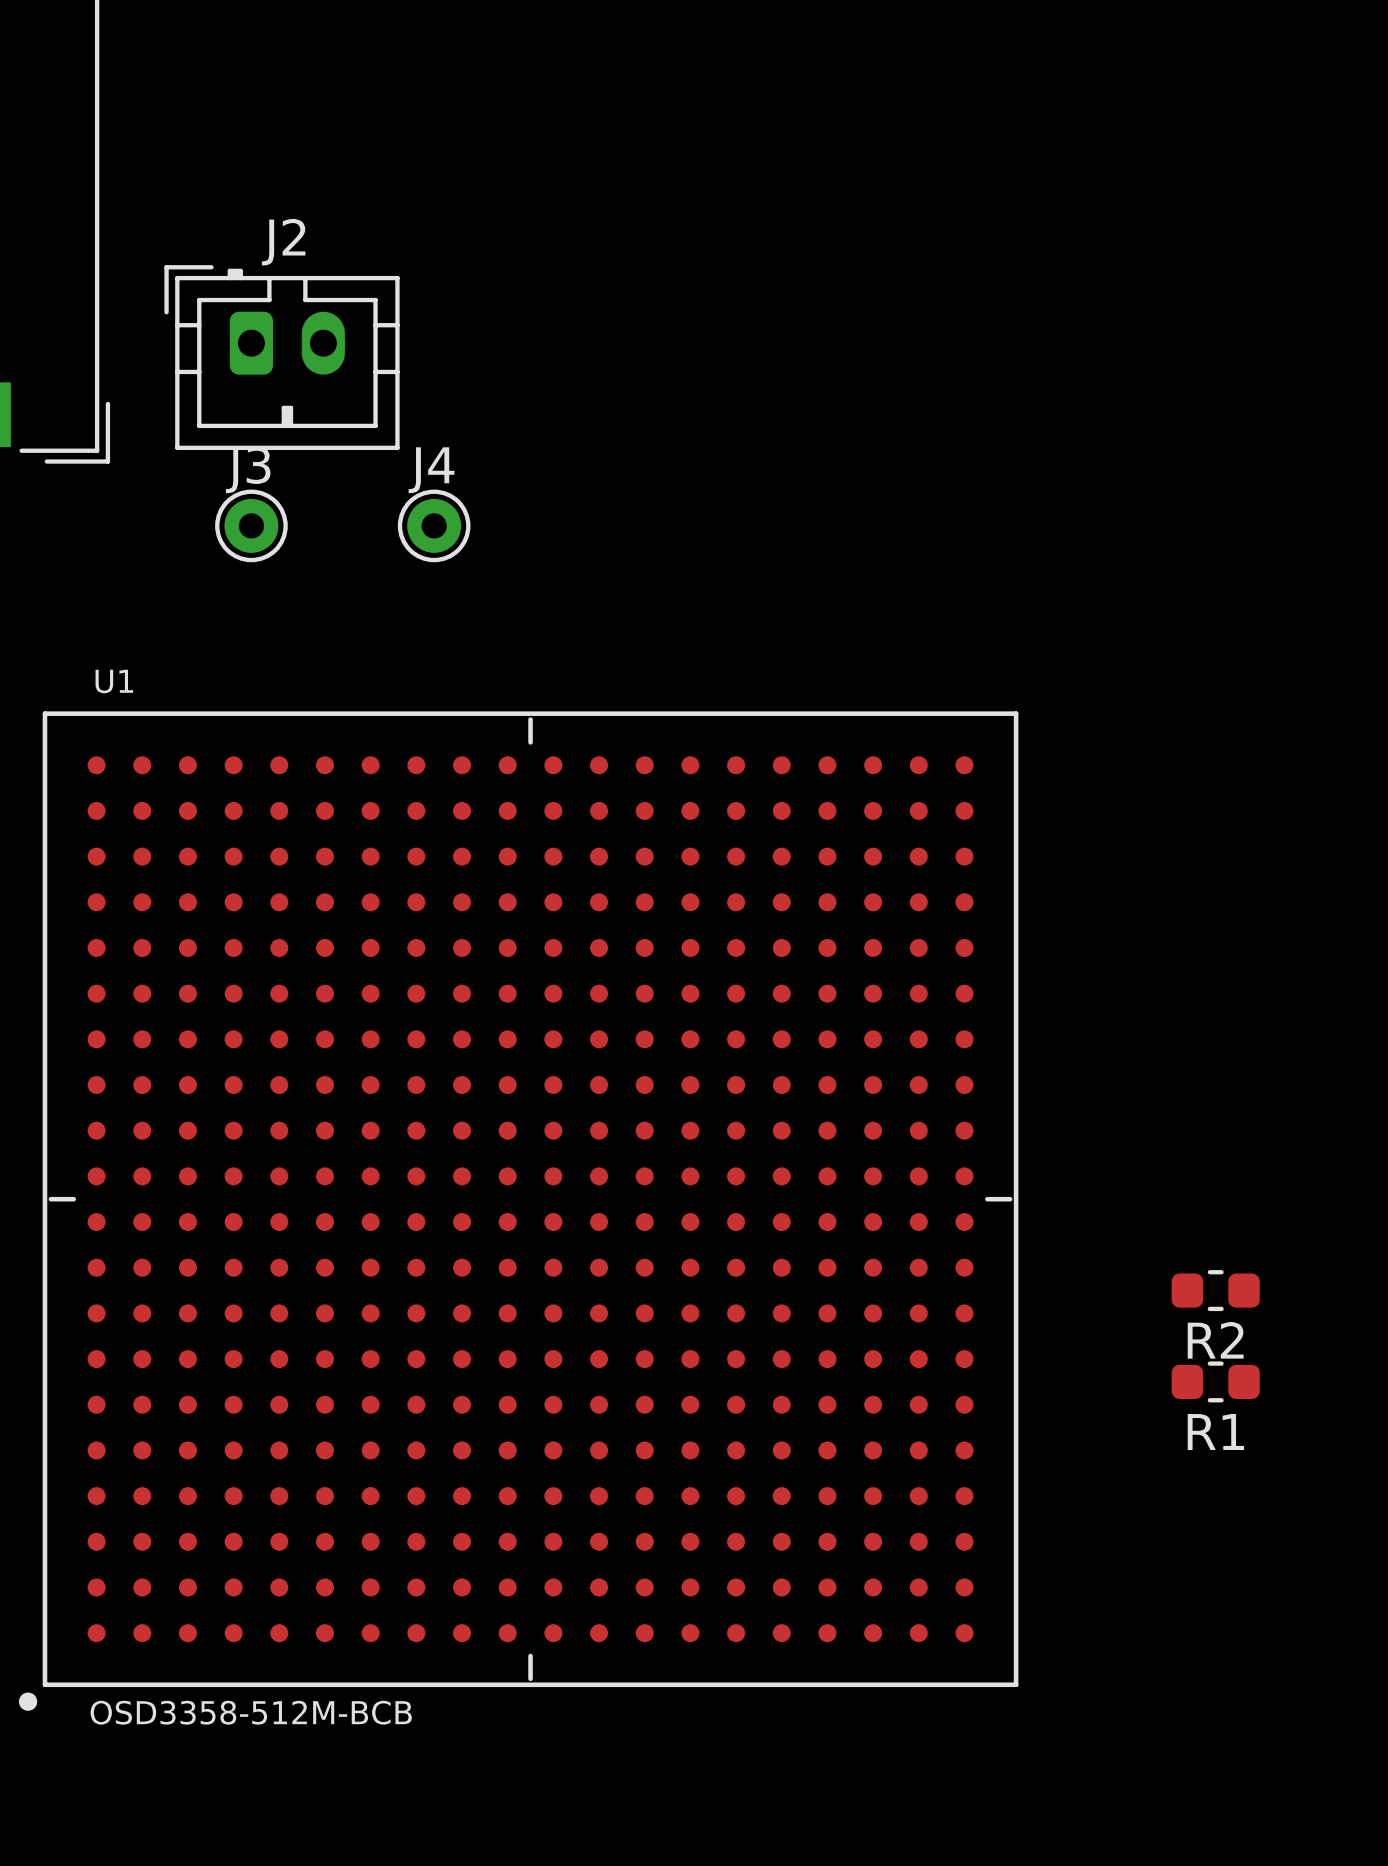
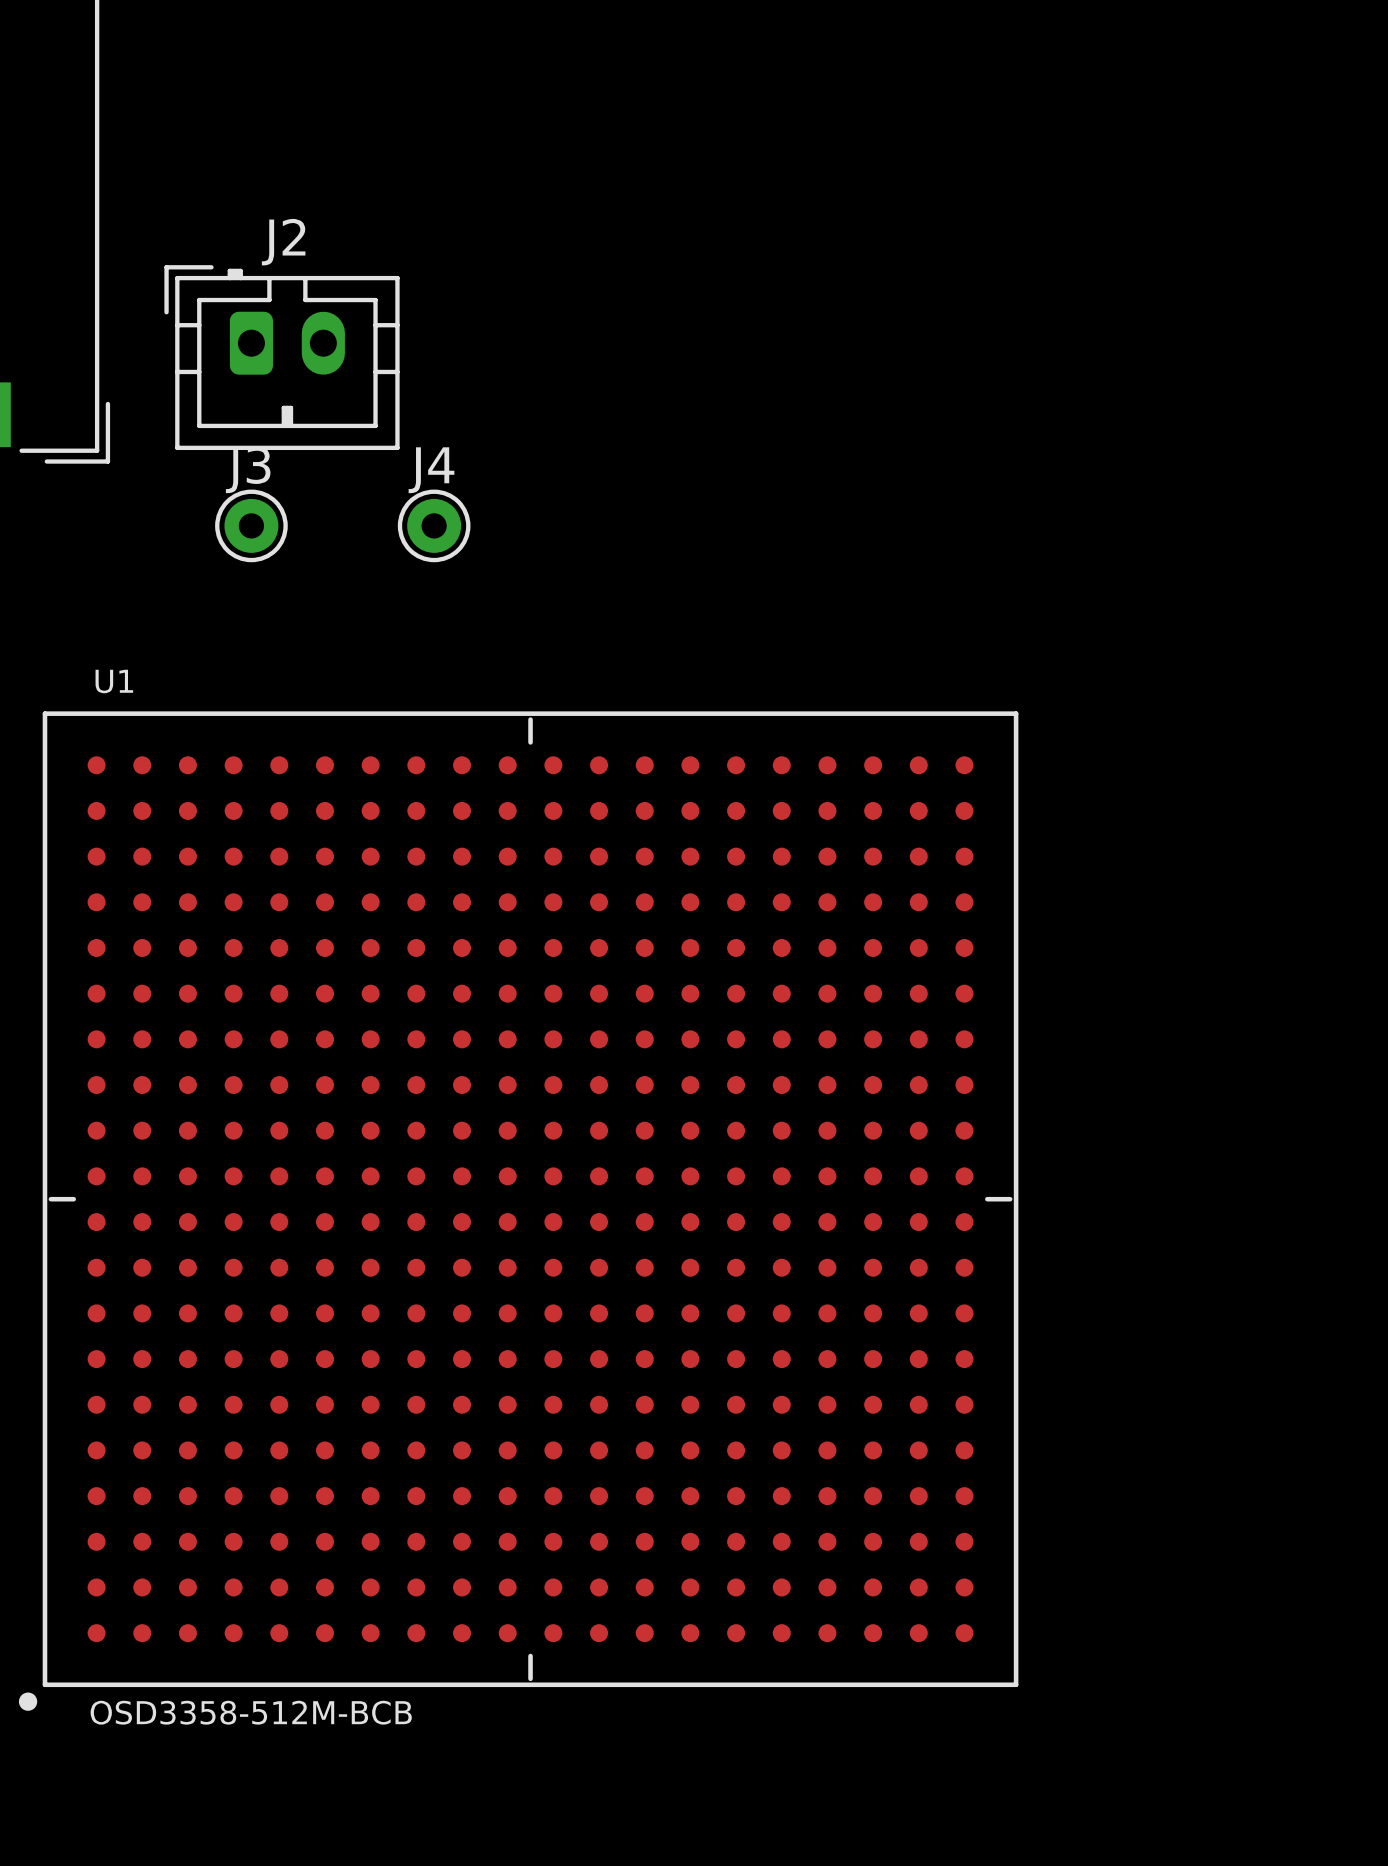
R2: (1215, 1290) -> none
R1: (1215, 1381) -> none

